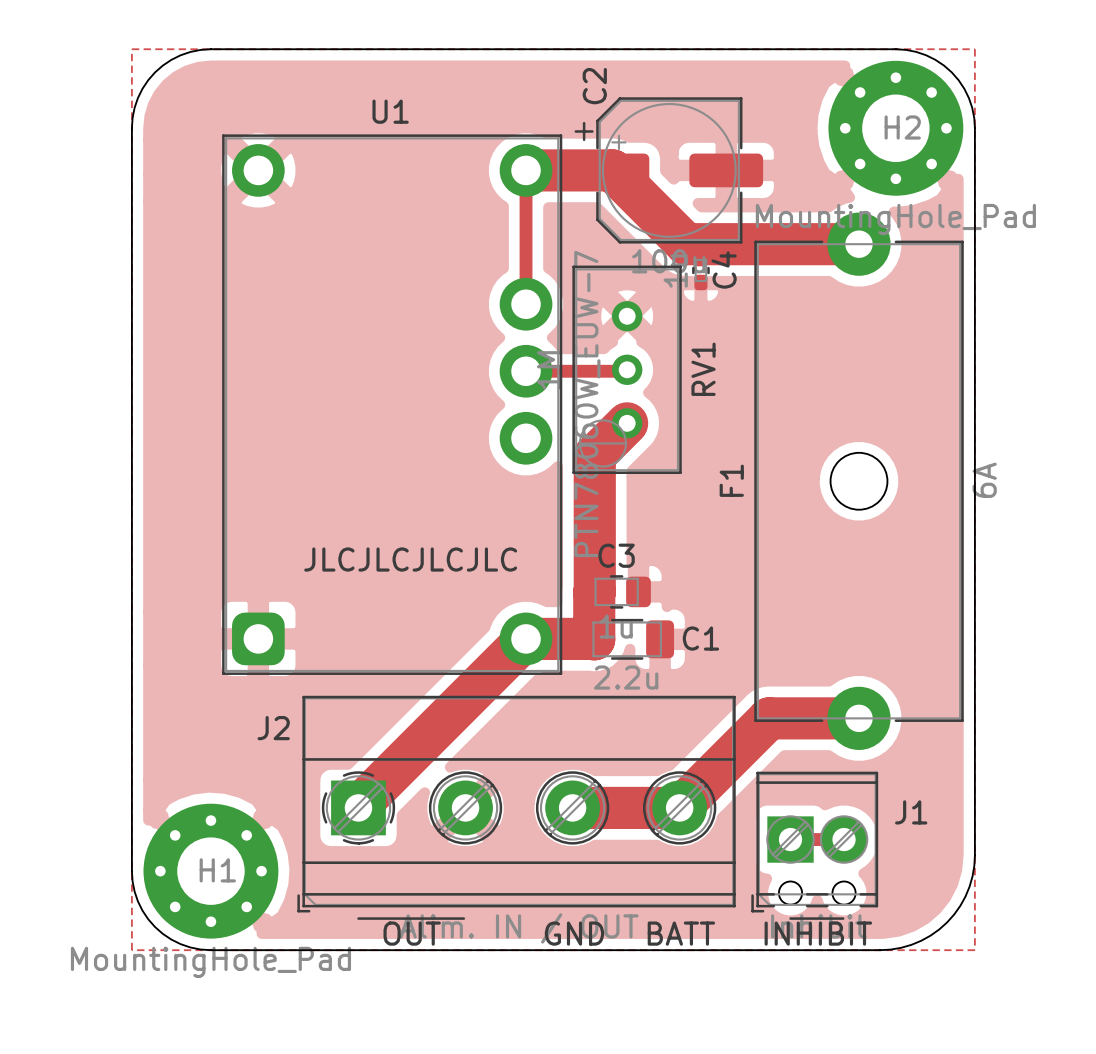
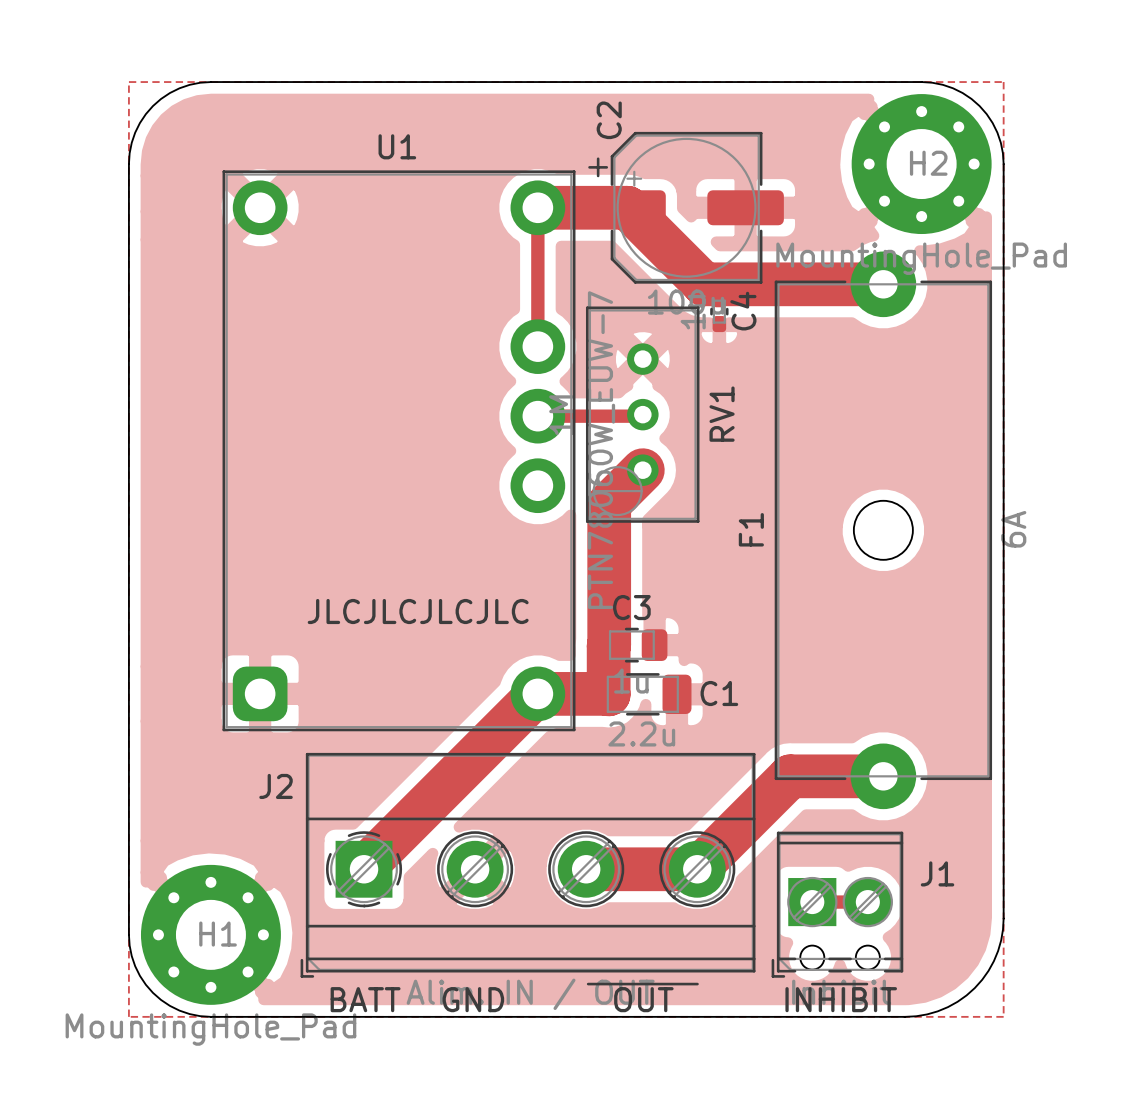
line: (358, 918) (463, 918) -> (588, 984) (697, 984)
text position: OUT (412, 933) -> OUT (643, 999)
text position: GND (574, 933) -> GND (473, 999)
text position: BATT (681, 933) -> BATT (365, 999)

